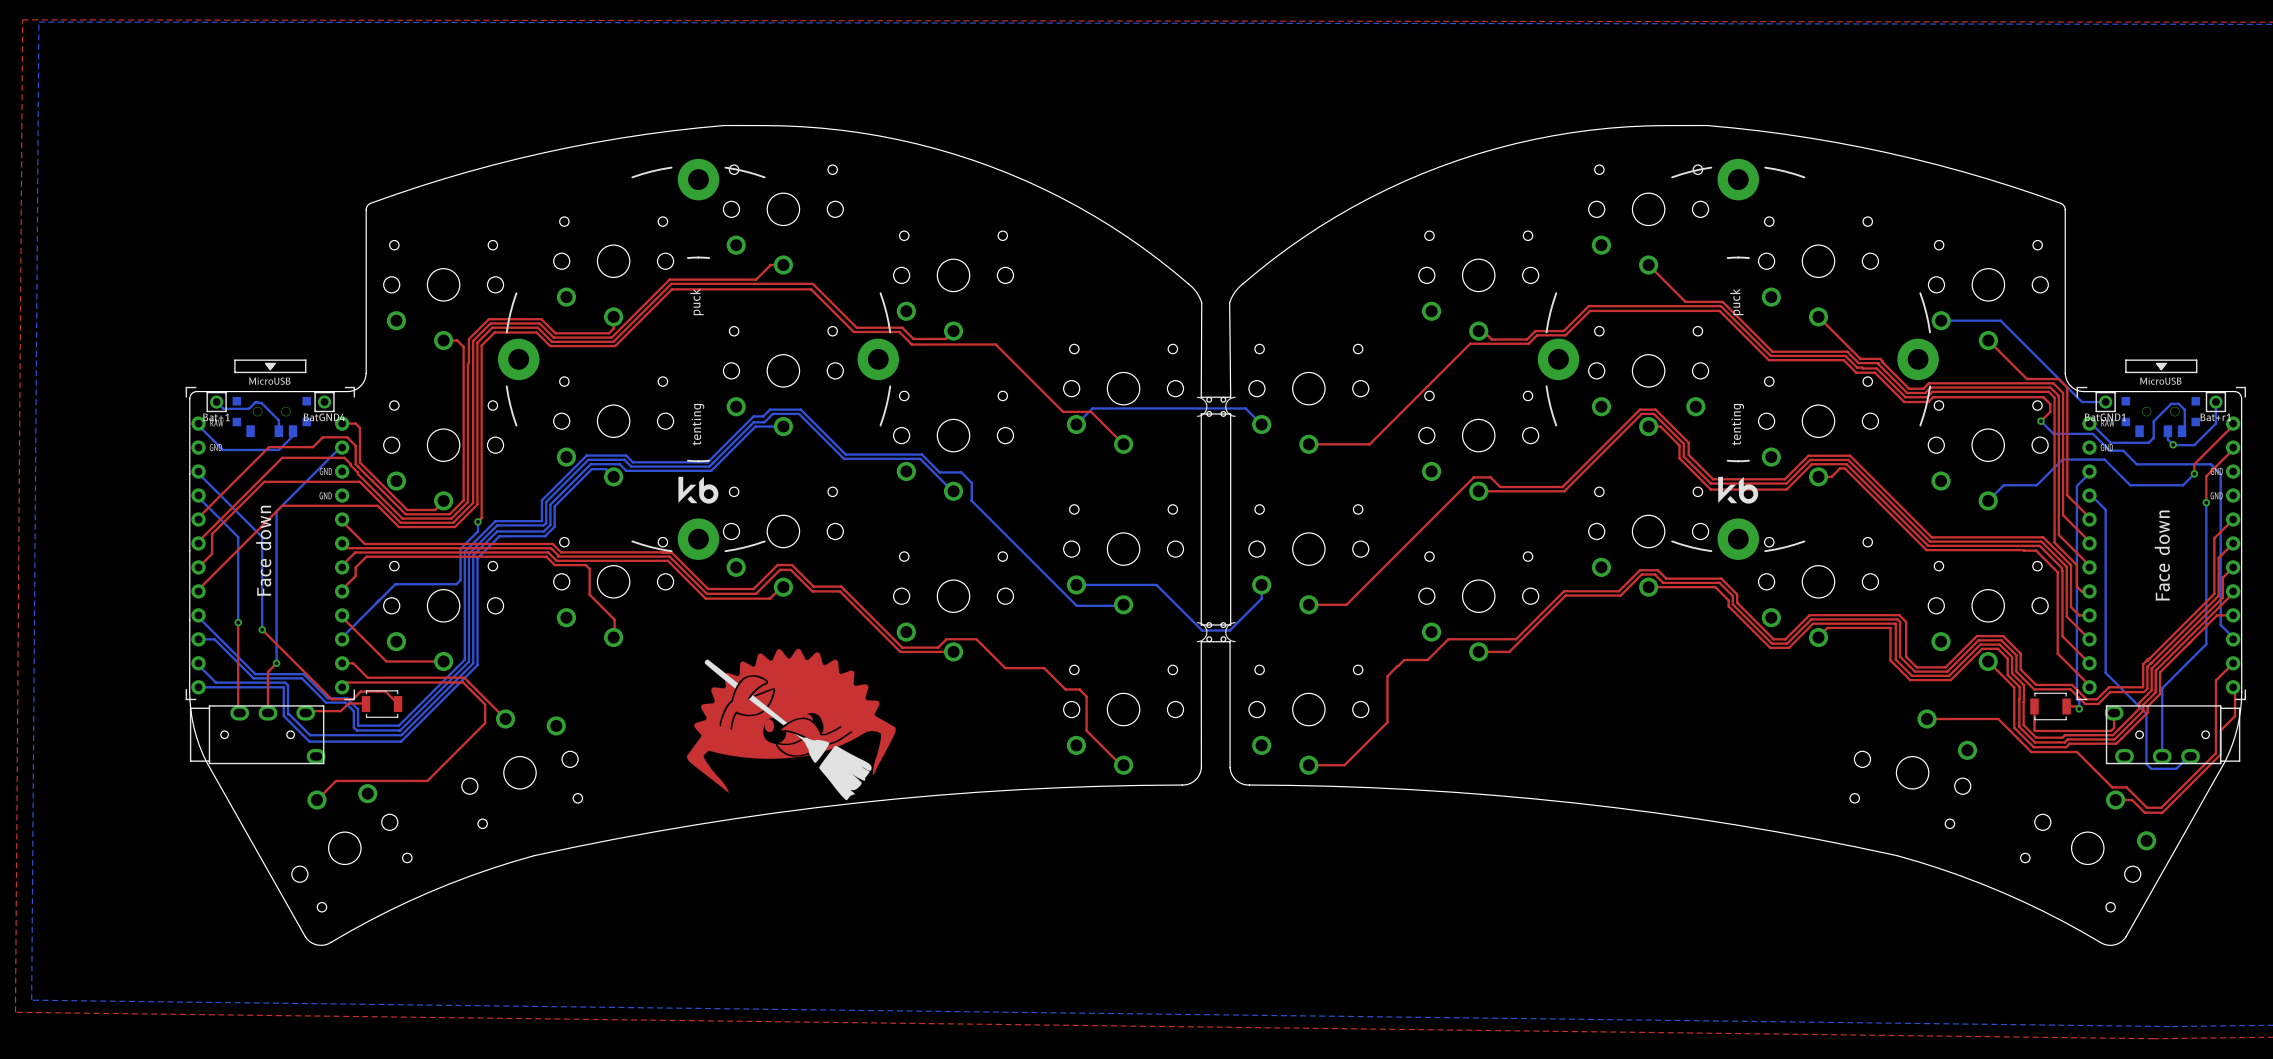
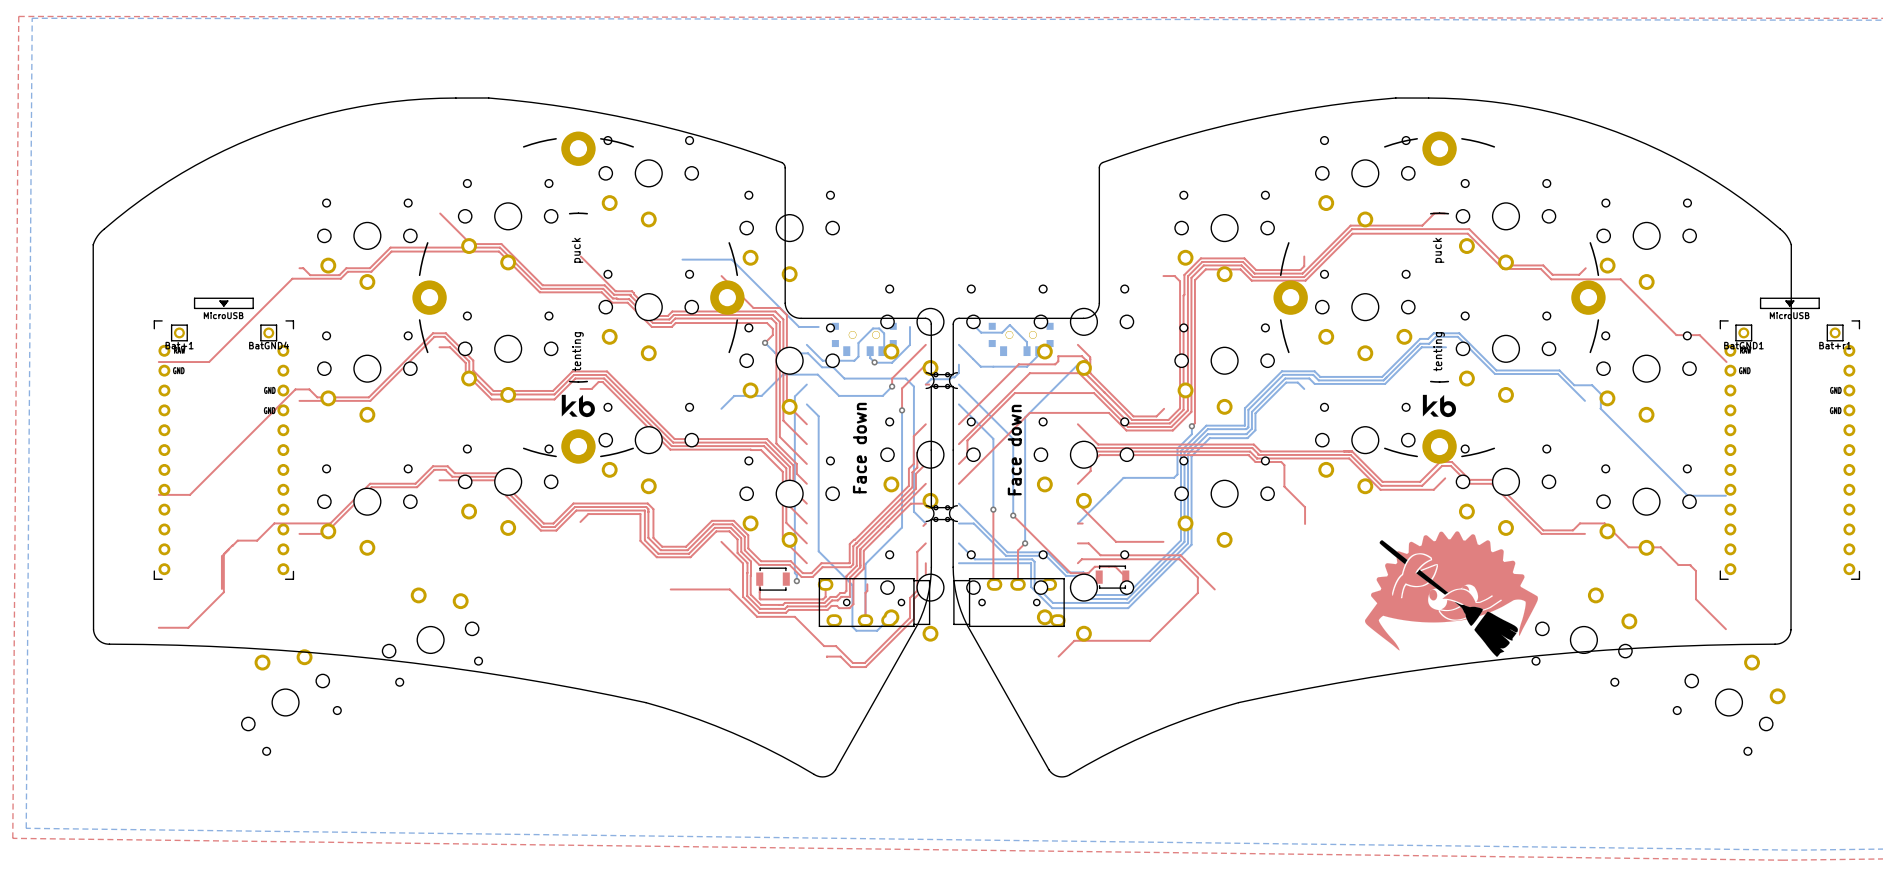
board edge: none -> (488, 98) (423, 98) (376, 103) (329, 113) (283, 126) (224, 150) (182, 173) (129, 208) (97, 236) (93, 244) (93, 629) (100, 641) (107, 644) (210, 646) (345, 655) (479, 672) (579, 689) (645, 702) (698, 719) (749, 740) (815, 775) (824, 776) (830, 774) (835, 769) (920, 617) (930, 582) (931, 519) (953, 519) (954, 582) (963, 617) (1048, 769) (1055, 775) (1062, 776) (1068, 775) (1135, 740) (1186, 719) (1238, 702) (1304, 689) (1404, 672) (1538, 655) (1673, 646) (1777, 644) (1784, 641) (1790, 633) (1791, 244) (1782, 231) (1729, 190) (1688, 165) (1631, 137) (1570, 117) (1523, 106) (1460, 98) (1395, 98) (1310, 108) (1247, 120) (1184, 136) (1123, 155) (1102, 162) (1099, 166) (1099, 303) (1095, 312) (1089, 317) (1083, 318) (956, 318) (953, 324) (953, 374) (931, 374) (931, 323) (927, 318) (799, 318) (793, 316) (787, 310) (785, 303) (785, 167) (782, 162) (720, 142) (637, 120) (552, 105) (488, 98)
top track: none -> (440, 213) (470, 244) (501, 244) (542, 285) (604, 285) (614, 294) (630, 294) (654, 319) (669, 319) (673, 315) (772, 315) (779, 321) (779, 436) (806, 463)
top track: none -> (1444, 213) (1433, 213) (1422, 225) (1350, 225) (1302, 273) (1254, 273) (1242, 261) (1202, 261) (1187, 276) (1187, 410) (1171, 426) (1127, 426) (1093, 393) (1014, 393) (967, 440) (967, 455) (958, 463)
top track: (783, 265) (770, 265) (756, 279) (669, 279) (611, 337) (553, 337) (539, 323) (490, 323) (473, 340) (473, 502) (453, 522) (400, 522) (359, 481) (264, 481) (212, 534) (212, 553) (198, 567) -> none
top track: (1648, 265) (1685, 301) (1722, 301) (1772, 351) (1847, 351) (1858, 363) (1878, 363) (1907, 392) (1925, 392) (1930, 387) (2050, 387) (2058, 395) (2058, 534) (2091, 567) -> none
board edge: (1188, 283) (1196, 292) (1201, 302) (1201, 397) (1230, 397) (1229, 302) (1234, 292) (1243, 283) -> none
board edge: (1188, 283) (1142, 247) (1110, 226) (1077, 206) (1026, 180) (990, 166) (935, 148) (878, 135) (821, 128) (724, 125) (621, 138) (494, 164) (419, 186) (368, 204) (366, 209) (366, 373) (361, 384) (349, 391) (196, 391) (192, 393) (189, 397) (189, 692) (193, 727) (206, 761) (306, 938) (315, 944) (327, 944) (409, 901) (470, 875) (513, 861) (574, 847) (654, 831) (775, 812) (896, 798) (1018, 789) (1189, 783) (1196, 778) (1201, 767) (1201, 641) (1230, 641) (1230, 767) (1234, 778) (1242, 783) (1412, 789) (1534, 798) (1656, 812) (1777, 831) (1857, 847) (1918, 861) (1960, 875) (2021, 901) (2104, 944) (2114, 944) (2124, 938) (2225, 761) (2237, 727) (2241, 692) (2241, 397) (2238, 393) (2234, 391) (2082, 391) (2069, 384) (2065, 373) (2065, 209) (2062, 204) (2012, 186) (1937, 164) (1810, 138) (1707, 125) (1609, 128) (1552, 135) (1514, 143) (1477, 154) (1423, 173) (1387, 188) (1336, 216) (1288, 247) (1243, 283) -> none
top track: none -> (580, 256) (615, 291) (631, 291) (655, 315) (667, 315) (672, 311) (775, 311) (783, 319) (783, 420) (806, 444)
top track: none -> (1304, 256) (1304, 266) (1300, 270) (1256, 270) (1244, 258) (1200, 258) (1184, 274) (1183, 409) (1169, 423) (1129, 423) (1079, 373) (1029, 373) (958, 444)
bottom track: none -> (682, 259) (731, 259) (799, 326) (818, 326)
top track: (613, 316) (613, 328) (608, 333) (555, 333) (541, 319) (488, 319) (468, 339) (467, 502) (451, 518) (402, 518) (344, 457) (282, 457) (196, 543) -> none
top track: (1818, 316) (1860, 358) (1880, 358) (1909, 388) (1923, 388) (1928, 383) (2053, 383) (2063, 392) (2063, 515) (2091, 543) -> none
bottom track: (1941, 320) (2000, 320) (2082, 402) (2105, 402) -> none
top track: none -> (299, 268) (303, 268) (310, 275) (339, 275) (346, 268) (369, 268) (390, 247) (500, 247) (541, 288) (603, 288) (612, 298) (629, 299) (652, 323) (670, 323) (675, 318) (771, 318) (776, 323) (776, 443) (796, 464) (796, 473) (806, 483)
top track: none -> (1585, 268) (1579, 274) (1552, 274) (1543, 265) (1505, 265) (1469, 229) (1352, 229) (1304, 277) (1253, 277) (1241, 265) (1203, 265) (1191, 277) (1191, 411) (1172, 430) (1126, 430) (1108, 412) (1029, 412) (958, 483)
top track: (953, 331) (945, 338) (913, 338) (902, 327) (856, 327) (812, 283) (671, 283) (613, 341) (551, 341) (537, 327) (492, 327) (477, 342) (477, 504) (454, 527) (398, 527) (377, 505) (282, 505) (196, 591) -> none
top track: (1478, 331) (1483, 331) (1491, 339) (1526, 339) (1535, 331) (1563, 331) (1588, 306) (1720, 306) (1770, 355) (1845, 355) (1857, 367) (1876, 368) (1905, 397) (1927, 397) (1932, 391) (2048, 391) (2054, 397) (2054, 542) (2076, 565) (2076, 586) (2081, 591) (2089, 591) -> none
top track: none -> (721, 276) (753, 307) (779, 307) (786, 315) (786, 404) (806, 424)
top track: none -> (1163, 276) (1174, 276) (1180, 281) (1180, 408) (1168, 419) (1132, 419) (1086, 374) (1086, 360) (1081, 356) (1058, 356) (1058, 361) (1055, 364) (1018, 364) (958, 424)
top track: (443, 340) (457, 340) (463, 346) (463, 500) (449, 514) (405, 514) (355, 464) (355, 445) (347, 437) (322, 437) (312, 447) (268, 447) (196, 519) -> none
top track: (1988, 340) (2026, 379) (2058, 379) (2067, 387) (2067, 495) (2091, 519) -> none
bottom track: none -> (909, 326) (909, 344) (892, 362) (874, 362) (870, 357) (870, 351)
bottom track: none -> (975, 326) (981, 332) (1002, 332) (1009, 325) (1027, 342) (1027, 351)
bottom track: (216, 402) (223, 408) (248, 408) (255, 402) (261, 402) (278, 420) (278, 431) -> none
bottom track: (2215, 402) (2215, 423) (2194, 445) (2173, 445) (2167, 439) (2167, 431) -> none
part: (1216, 406) -> none
part: none -> (864, 339)
part: none -> (1021, 339)
bottom track: none -> (765, 342) (775, 353) (808, 353) (822, 367) (833, 367) (844, 378) (905, 378) (913, 386) (913, 511) (925, 523)
top track: none -> (765, 342) (772, 335) (772, 328) (767, 323) (675, 323) (671, 326) (651, 326) (627, 302) (612, 302) (601, 292) (539, 292) (499, 251) (391, 251) (371, 271) (347, 271) (340, 278) (292, 278) (209, 362) (158, 362)
via: none -> (765, 342)
board edge: (1201, 414) (1201, 624) (1230, 624) (1230, 414) (1201, 414) -> none
bottom track: none -> (806, 344) (822, 360) (854, 360) (858, 356) (858, 342) (872, 328) (879, 328) (884, 333) (884, 348) (881, 351)
top track: none -> (925, 344) (892, 378) (892, 386)
bottom track: none -> (958, 344) (980, 366) (1027, 366) (1038, 355) (1038, 351)
top track: none -> (1077, 344) (1090, 359)
part: (271, 417) -> none
part: (2160, 417) -> none
top track: none -> (439, 347) (450, 347) (465, 363) (465, 373) (491, 399) (554, 399) (575, 378) (604, 378) (671, 446) (764, 446) (786, 468) (786, 522) (806, 543)
bottom track: none -> (1446, 347) (1421, 347) (1385, 383) (1314, 383) (1309, 378) (1285, 378) (1251, 411) (1251, 428) (1246, 434) (1207, 434) (1188, 453) (1188, 543) (1128, 602) (1052, 602) (1034, 585) (1034, 561) (1032, 559) (974, 559) (958, 543)
bottom track: (2040, 421) (2053, 433) (2092, 433) (2109, 450) (2123, 450) (2136, 464) (2211, 464) (2220, 473) (2220, 625) (2235, 639) -> none
top track: (2040, 421) (2050, 411) (2050, 404) (2043, 397) (1933, 397) (1928, 402) (1904, 402) (1874, 372) (1856, 372) (1843, 360) (1768, 360) (1719, 310) (1589, 310) (1565, 335) (1537, 335) (1528, 343) (1470, 343) (1369, 444) (1308, 444) -> none
via: (2040, 421) -> none
bottom track: (196, 423) (223, 449) (278, 449) (293, 435) (293, 431) -> none
top track: (342, 423) (355, 423) (359, 427) (359, 462) (407, 510) (435, 510) (444, 500) -> none
bottom track: (2091, 423) (2110, 442) (2148, 442) (2153, 437) (2153, 421) (2171, 403) (2178, 403) (2184, 409) (2184, 428) (2182, 431) -> none
top track: (2235, 423) (2194, 464) (2194, 473) -> none
bottom track: (1076, 424) (1092, 408) (1245, 408) (1261, 424) -> none
bottom track: (784, 426) (755, 426) (711, 470) (626, 470) (619, 464) (590, 464) (550, 504) (550, 524) (543, 531) (497, 531) (473, 555) (473, 663) (401, 735) (310, 735) (288, 714) (288, 685) (285, 682) (215, 682) (196, 663) -> none
top track: (1647, 426) (1660, 426) (1679, 445) (1679, 458) (1710, 489) (1786, 489) (1811, 464) (1846, 464) (1928, 545) (2039, 545) (2061, 568) (2062, 636) (2089, 663) -> none
top track: none -> (1090, 359) (1090, 373) (1133, 416) (1156, 416) (1164, 408)
via: none -> (874, 362)
top track: none -> (1726, 362) (1699, 335) (1676, 335) (1620, 279) (1551, 279) (1540, 268) (1503, 268) (1467, 233) (1352, 233) (1305, 280) (1251, 280) (1240, 269) (1205, 269) (1194, 280) (1194, 423) (1191, 426)
top track: none -> (925, 364) (902, 388) (902, 410)
bottom track: none -> (958, 364) (958, 372) (954, 377) (931, 379) (925, 384)
bottom track: none -> (1077, 364) (1025, 417) (1025, 543)
top track: (1123, 444) (1091, 411) (1063, 411) (995, 344) (911, 344) (899, 331) (853, 331) (811, 289) (671, 289) (615, 346) (550, 346) (536, 332) (494, 332) (481, 345) (481, 518) (477, 521) -> none
via: (2173, 444) -> none
bottom track: (340, 447) (276, 511) (276, 663) -> none
top track: (2235, 447) (2206, 476) (2206, 502) -> none
part: none -> (941, 380)
bottom track: none -> (806, 384) (794, 396) (794, 573) (796, 581)
top track: none -> (925, 384) (929, 384)
bottom track: none -> (958, 384) (1013, 438) (1013, 515)
bottom track: none -> (892, 386) (882, 395) (839, 395) (817, 374) (782, 374) (761, 395) (734, 395) (721, 408)
via: none -> (892, 386)
board edge: none -> (931, 386) (953, 386) (953, 507) (931, 507) (931, 386)
top track: none -> (580, 388) (591, 388) (598, 382) (602, 382) (670, 449) (761, 450) (782, 471) (782, 539) (806, 563)
bottom track: none -> (1304, 388) (1297, 382) (1286, 382) (1255, 413) (1255, 430) (1247, 438) (1209, 438) (1191, 456) (1191, 544) (1128, 608) (1052, 608) (1031, 586) (1031, 563) (958, 563)
bottom track: (196, 471) (262, 537) (262, 629) -> none
bottom track: (2091, 471) (2076, 486) (2076, 699) (2079, 701) (2079, 708) -> none
bottom track: (2194, 473) (2183, 485) (2130, 485) (2104, 459) (2062, 459) (2036, 485) (2003, 485) (1988, 500) -> none
via: (2194, 473) -> none
bottom track: (613, 476) (605, 469) (591, 469) (554, 506) (554, 526) (545, 536) (499, 536) (477, 558) (477, 665) (401, 741) (309, 741) (283, 715) (283, 687) (196, 687) -> none
top track: (1818, 476) (1831, 476) (1839, 468) (1844, 468) (1926, 550) (2036, 550) (2057, 572) (2057, 653) (2091, 687) -> none
top track: none -> (299, 400) (370, 400) (434, 336) (444, 336) (469, 361) (469, 372) (491, 394) (554, 394) (573, 374) (605, 374) (673, 442) (765, 442) (789, 466) (789, 506) (806, 523)
bottom track: none -> (1584, 400) (1558, 374) (1495, 374) (1457, 336) (1436, 336) (1429, 343) (1420, 343) (1383, 380) (1318, 380) (1313, 374) (1283, 374) (1248, 409) (1248, 427) (1246, 429) (1207, 429) (1184, 452) (1184, 541) (1127, 599) (1091, 598) (1089, 596) (1089, 582) (1082, 575) (1066, 575) (1046, 555) (1006, 555) (973, 523) (958, 523)
bottom track: none -> (806, 404) (818, 416) (818, 551) (852, 585) (852, 626) (856, 630) (877, 630) (888, 618)
bottom track: none -> (958, 404) (993, 438) (993, 511)
bottom track: (952, 491) (920, 458) (843, 458) (799, 413) (772, 413) (764, 422) (753, 422) (709, 466) (631, 466) (624, 459) (588, 459) (546, 502) (546, 523) (543, 525) (497, 525) (469, 553) (469, 661) (399, 731) (356, 730) (353, 727) (353, 711) (345, 702) (326, 702) (301, 678) (253, 678) (214, 639) (196, 639) -> none
top track: (1478, 491) (1564, 491) (1641, 413) (1653, 413) (1683, 443) (1683, 456) (1710, 483) (1786, 483) (1810, 459) (1848, 459) (1930, 541) (2041, 541) (2066, 566) (2066, 616) (2089, 639) -> none
bottom track: (196, 495) (238, 537) (238, 624) -> none
bottom track: none -> (902, 410) (902, 527) (865, 564) (865, 618)
via: none -> (902, 410)
bottom track: (2091, 495) (2105, 509) (2105, 672) (2146, 713) (2146, 764) (2151, 768) (2176, 768) (2190, 754) -> none
bottom track: (2206, 502) (2206, 644) (2162, 688) (2162, 754) -> none
via: (2206, 502) -> none
top track: none -> (925, 424) (913, 436) (913, 463) (908, 468) (908, 485) (849, 544) (849, 563) (821, 563) (811, 573) (802, 573) (790, 561) (761, 561) (748, 548) (748, 535) (733, 520) (711, 520) (686, 546) (662, 546) (653, 537) (653, 509) (647, 503) (573, 503) (553, 523) (543, 523) (513, 493) (513, 486) (500, 473) (454, 473) (447, 466) (433, 466) (415, 483) (370, 483) (330, 523) (274, 523) (257, 540) (237, 540) (223, 554) (223, 592) (188, 627) (158, 627)
bottom track: none -> (1191, 426) (1191, 434) (1177, 448) (1177, 474) (1174, 477) (1123, 477) (1077, 523)
via: none -> (1191, 426)
top track: (340, 519) (364, 543) (552, 543) (561, 552) (671, 552) (708, 589) (753, 589) (777, 565) (791, 565) (813, 586) (841, 586) (902, 647) (938, 647) (946, 639) (976, 639) (1005, 668) (1044, 668) (1065, 689) (1079, 689) (1086, 696) (1086, 730) (1122, 766) -> none
top track: (2233, 519) (2214, 538) (2214, 593) (2146, 660) -> none
bottom track: (477, 521) (477, 531) (460, 548) (460, 580) (456, 584) (395, 584) (340, 639) -> none
via: (477, 521) -> none
top track: none -> (925, 444) (917, 452) (917, 467) (912, 472) (912, 487) (856, 543)
top track: none -> (1077, 444) (1081, 448) (1252, 448) (1258, 454) (1350, 454) (1381, 485) (1422, 485) (1442, 465) (1450, 465) (1468, 483) (1491, 483) (1541, 533) (1584, 533)
text: none -> Face down (859, 448)
top track: (340, 543) (345, 548) (551, 548) (558, 556) (669, 556) (706, 593) (756, 593) (780, 569) (790, 569) (812, 591) (839, 591) (900, 651) (952, 651) -> none
text: none -> Face down (1014, 450)
top track: (2233, 543) (2218, 557) (2218, 595) (2151, 663) -> none
top track: none -> (1248, 455) (1099, 455) (1090, 463) (1090, 471) (1077, 483)
top track: none -> (1248, 455) (1255, 462) (1281, 462) (1284, 465) (1284, 486) (1305, 507) (1305, 523)
text: Face down (263, 550) -> none
top track: none -> (1256, 458) (1250, 451) (1090, 451) (1077, 463)
top track: none -> (1256, 458) (1349, 458) (1380, 489) (1433, 489) (1445, 478)
text: Face down (2162, 555) -> none
top track: (546, 556) (366, 556) (355, 567) (355, 576) (340, 591) -> none
top track: (546, 556) (554, 565) (585, 565) (589, 568) (589, 594) (614, 619) (614, 639) -> none
top track: (556, 560) (548, 552) (355, 552) (340, 567) -> none
top track: (556, 560) (667, 560) (705, 598) (770, 598) (783, 584) -> none
top track: none -> (923, 463) (925, 463) (915, 473) (915, 488) (856, 547)
top track: (2233, 567) (2222, 577) (2222, 597) (2151, 668) -> none
top track: (1657, 570) (1639, 570) (1618, 591) (1564, 591) (1516, 639) (1448, 639) (1427, 660) (1404, 660) (1387, 676) (1387, 722) (1344, 765) (1308, 765) -> (1372, 472) (1352, 451) (1260, 451) (1253, 444) (1098, 444) (1077, 424)
top track: (1666, 578) (1721, 578) (1737, 594) (1737, 602) (1773, 639) (1785, 639) (1809, 615) (1899, 615) (1906, 622) (1906, 656) (1916, 667) (1945, 667) (1976, 636) (2003, 636) (2020, 653) (2020, 669) (2036, 684) (2072, 684) (2086, 699) (2097, 699) (2109, 687) (2142, 687) (2143, 664) (2149, 658) -> (1379, 479) (1382, 481) (1420, 481) (1440, 461) (1451, 461) (1469, 479) (1492, 479) (1543, 530) (1572, 530) (1579, 523) (1604, 523) (1628, 547) (1660, 547) (1678, 565) (1690, 565) (1695, 570) (1695, 599) (1725, 629)
top track: none -> (439, 480) (495, 480) (506, 491) (506, 496) (540, 530) (556, 530) (576, 510) (644, 510) (644, 540) (658, 553) (689, 553) (714, 527) (730, 527) (741, 538) (741, 551) (750, 561) (750, 594) (761, 604) (824, 602) (830, 596) (836, 596) (840, 593) (844, 593) (846, 591) (846, 576) (856, 565) (856, 547)
bottom track: (1076, 584) (1156, 584) (1202, 630) (1229, 630) (1261, 598) (1261, 584) -> none
top track: none -> (925, 483) (860, 549) (860, 567) (849, 577) (849, 596) (841, 596) (837, 600) (832, 600) (826, 606) (760, 608) (747, 595) (747, 562) (737, 553) (737, 539) (729, 531) (716, 531) (690, 557) (656, 557) (640, 540) (640, 514) (588, 514) (580, 521)
top track: (1647, 587) (1715, 587) (1728, 600) (1728, 606) (1770, 647) (1788, 647) (1813, 623) (1895, 623) (1895, 659) (1912, 675) (1949, 675) (1980, 644) (1999, 644) (2012, 657) (2012, 673) (2023, 685) (2023, 725) (2036, 737) (2062, 737) (2064, 735) (2112, 735) (2139, 708) (2139, 702) (2151, 690) (2151, 668) -> none
top track: (2235, 591) (2155, 670) (2155, 692) (2143, 704) (2143, 710) (2114, 739) (2067, 739) (2064, 742) (2034, 742) (2019, 726) (2019, 686) (2007, 674) (2007, 658) (1997, 648) (1982, 648) (1950, 680) (1910, 680) (1890, 660) (1890, 627) (1827, 627) (1818, 637) -> none
top track: none -> (158, 494) (189, 494) (295, 389) (309, 389) (317, 397) (368, 397) (433, 333) (445, 333) (473, 360) (473, 370) (493, 390) (552, 390) (572, 371) (607, 371) (674, 439) (766, 439) (793, 465) (793, 490) (806, 503)
bottom track: none -> (1725, 495) (1687, 495) (1600, 408) (1600, 393) (1592, 385) (1574, 385) (1559, 370) (1496, 370) (1459, 333) (1433, 333) (1428, 338) (1420, 338) (1382, 376) (1320, 376) (1314, 371) (1281, 371) (1244, 408) (1244, 425) (1206, 425) (1180, 451) (1180, 540) (1126, 594) (1092, 594) (1092, 581) (1083, 572) (1067, 572) (1047, 552) (1007, 552) (958, 503)
top track: (1308, 604) (1346, 604) (1473, 477) (1490, 477) (1500, 487) (1562, 487) (1639, 409) (1655, 409) (1688, 442) (1688, 454) (1713, 479) (1784, 479) (1808, 455) (1850, 455) (1931, 537) (2043, 537) (2071, 565) (2071, 607) (2079, 615) (2089, 615) -> none
bottom track: (1122, 605) (1076, 605) (971, 500) (971, 482) (961, 472) (939, 472) (921, 454) (845, 454) (800, 409) (769, 409) (763, 416) (753, 416) (707, 462) (632, 462) (626, 455) (586, 455) (541, 500) (541, 521) (495, 521) (464, 551) (464, 659) (398, 725) (358, 725) (358, 709) (347, 698) (327, 698) (303, 674) (255, 674) (196, 615) -> none
top track: none -> (925, 503) (910, 503) (863, 550) (863, 568) (853, 579) (853, 604) (849, 608) (831, 605) (827, 609) (788, 609) (785, 612) (759, 612) (743, 596) (743, 563) (721, 541)
top track: none -> (1077, 503) (1116, 541) (1163, 541)
top track: (340, 615) (386, 661) (443, 661) -> none
top track: none -> (993, 509) (994, 582)
via: none -> (993, 509)
top track: (2235, 615) (2217, 615) (2160, 672) (2160, 693) (2147, 706) (2147, 712) (2116, 743) (2069, 743) (2066, 747) (2033, 747) (2014, 727) (2014, 687) (1988, 661) -> none
top track: (238, 622) (239, 711) -> none
via: (238, 622) -> none
top track: none -> (1013, 515) (1070, 573) (1088, 573) (1094, 566) (1115, 566) (1125, 577)
via: none -> (1013, 515)
top track: (262, 629) (331, 699) (353, 699) (360, 691) (385, 691) (398, 704) -> none
via: (262, 629) -> none
top track: none -> (925, 523) (923, 525)
part position: (1216, 632) -> (941, 513)
top track: none -> (1077, 523) (1082, 523)
drawing: none -> [1365, 531, 1538, 657]
top track: none -> (299, 533) (324, 533) (371, 487) (417, 487) (434, 469) (445, 469) (452, 476) (498, 476) (509, 487) (509, 494) (542, 527) (554, 527) (574, 507) (646, 507) (648, 509) (648, 537) (660, 550) (687, 550) (713, 524) (732, 524) (744, 536) (744, 550) (759, 564) (789, 564) (801, 577) (812, 577) (822, 567) (850, 567) (853, 564) (853, 546) (856, 543)
drawing: [686, 648, 896, 801] -> none
top track: (1478, 651) (1509, 651) (1565, 595) (1620, 595) (1641, 574) (1655, 574) (1663, 582) (1719, 582) (1732, 596) (1732, 604) (1771, 643) (1787, 643) (1811, 619) (1897, 619) (1900, 621) (1900, 656) (1914, 671) (1947, 671) (1978, 640) (2001, 640) (2016, 655) (2016, 671) (2034, 689) (2070, 689) (2085, 703) (2098, 703) (2110, 692) (2144, 692) (2147, 688) (2147, 666) (2151, 663) -> none
top track: none -> (925, 543) (917, 551) (917, 590) (909, 597) (909, 617) (864, 662) (852, 662) (836, 646) (824, 646) (794, 616) (757, 616) (729, 589) (670, 589)
top track: none -> (1025, 543) (1018, 550) (1018, 582)
via: none -> (1025, 543)
top track: none -> (1077, 543) (1088, 543) (1100, 555) (1180, 555) (1214, 589)
via: (276, 663) -> none
top track: (340, 663) (353, 663) (367, 677) (464, 677) (505, 718) -> none
top track: (2233, 663) (2215, 680) (2215, 753) (2161, 807) (2147, 807) (2126, 787) (2112, 787) (2076, 752) (2031, 752) (1998, 718) (1927, 718) -> none
top track: none -> (925, 563) (925, 587) (913, 598) (913, 618) (865, 667) (851, 667) (840, 656) (826, 656)
top track: none -> (1077, 563) (1081, 559) (1179, 559) (1197, 577) (1197, 593) (1150, 640) (1074, 640) (1058, 656)
top track: (340, 687) (345, 682) (463, 682) (485, 704) (485, 723) (427, 780) (336, 780) (316, 800) -> none
top track: (2235, 687) (2235, 716) (2220, 730) (2220, 754) (2162, 812) (2144, 812) (2132, 800) (2115, 800) -> none
part: none -> (1112, 577)
top track: none -> (759, 579) (760, 599) (823, 599) (825, 596) (825, 582)
part: none -> (773, 579)
via: none -> (796, 581)
top track: (366, 704) (348, 703) (340, 711) (305, 711) -> none
part: (382, 704) -> none
top track: none -> (867, 584) (865, 620)
top track: (2034, 706) (2035, 730) (2111, 730) (2114, 727) (2114, 710) -> none
part: (2050, 706) -> none
top track: (2066, 706) (2076, 706) (2079, 708) -> none
via: (2079, 708) -> none
part: none -> (874, 602)
part: none -> (1009, 602)
part: (257, 734) -> none
part: (2172, 734) -> none

